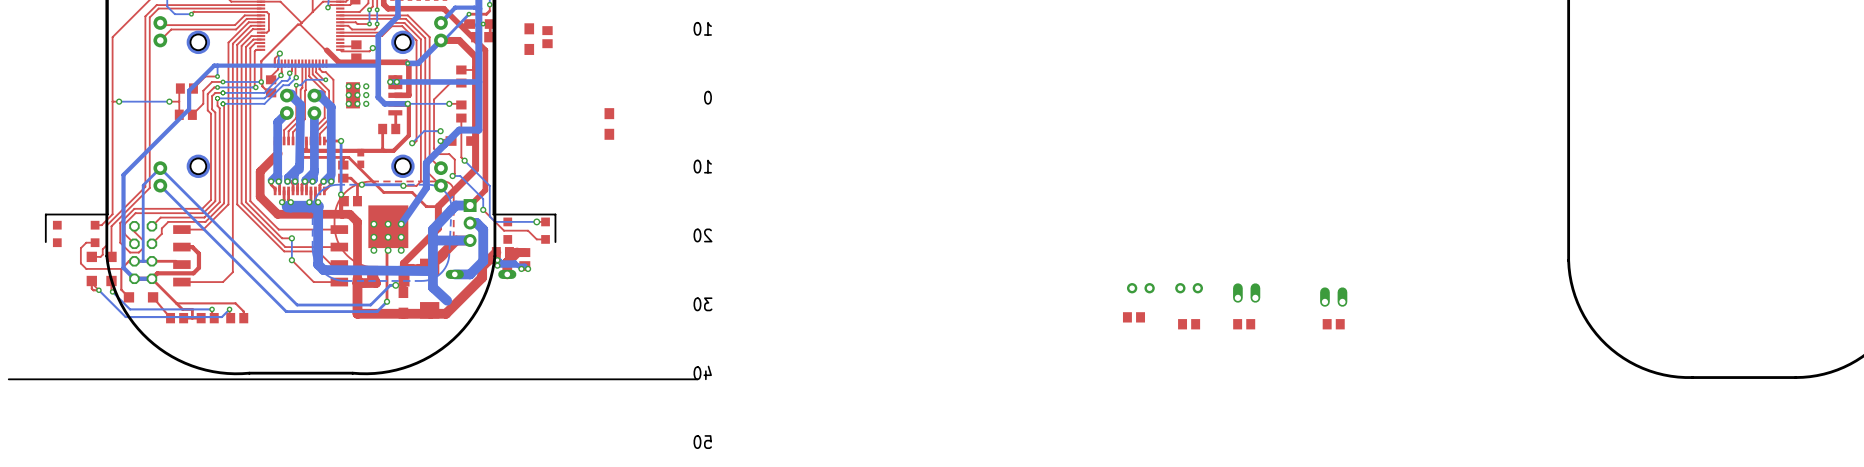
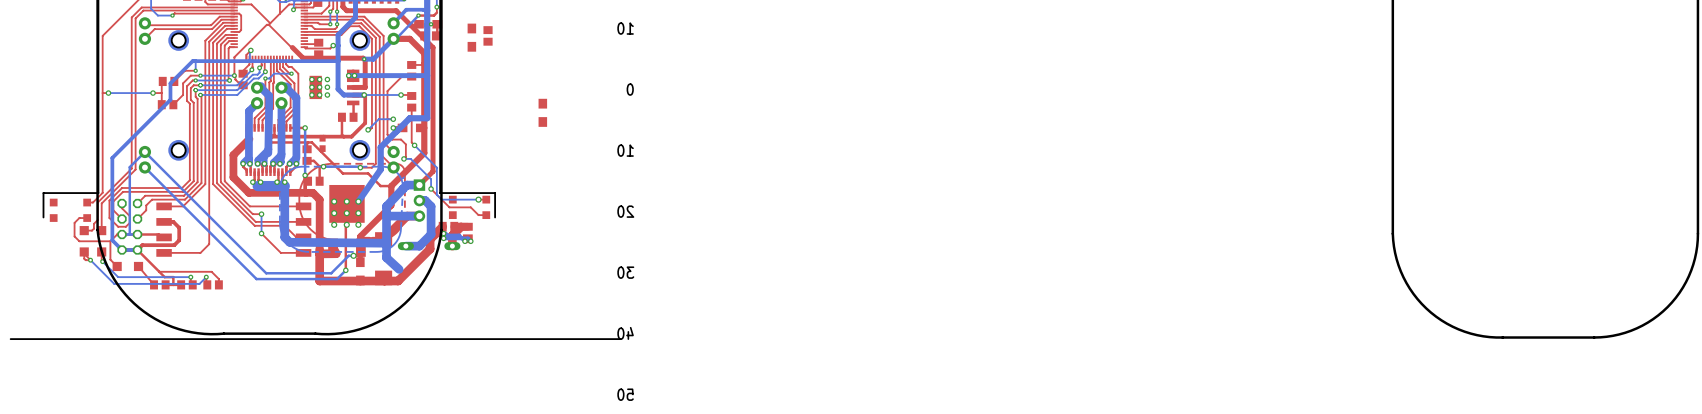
part: (1140, 288) -> none
part: (1189, 288) -> none
part: (1246, 293) -> none
part: (1333, 297) -> none
part: (1133, 317) -> none
part: (1189, 324) -> none
part: (1244, 324) -> none
part: (1333, 324) -> none

